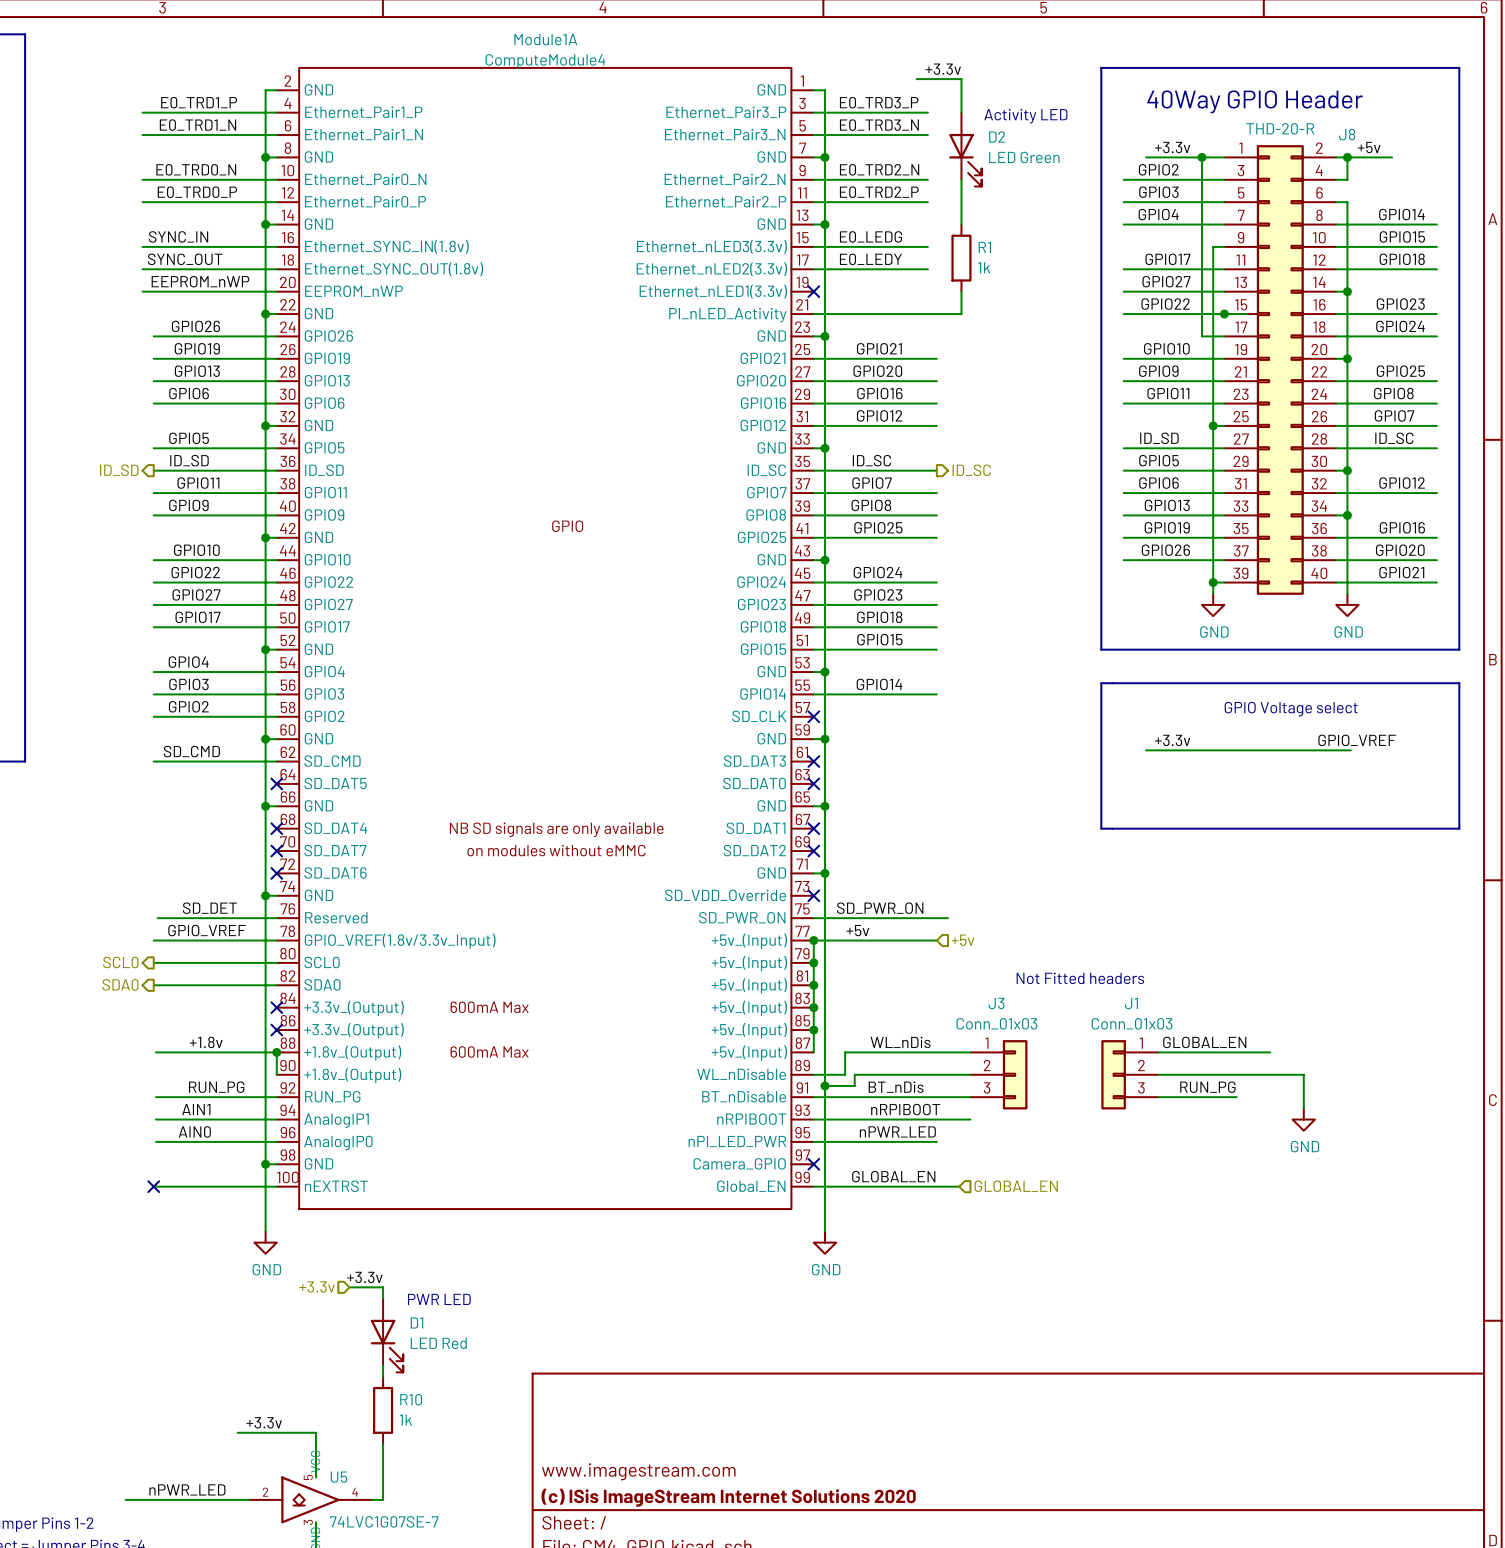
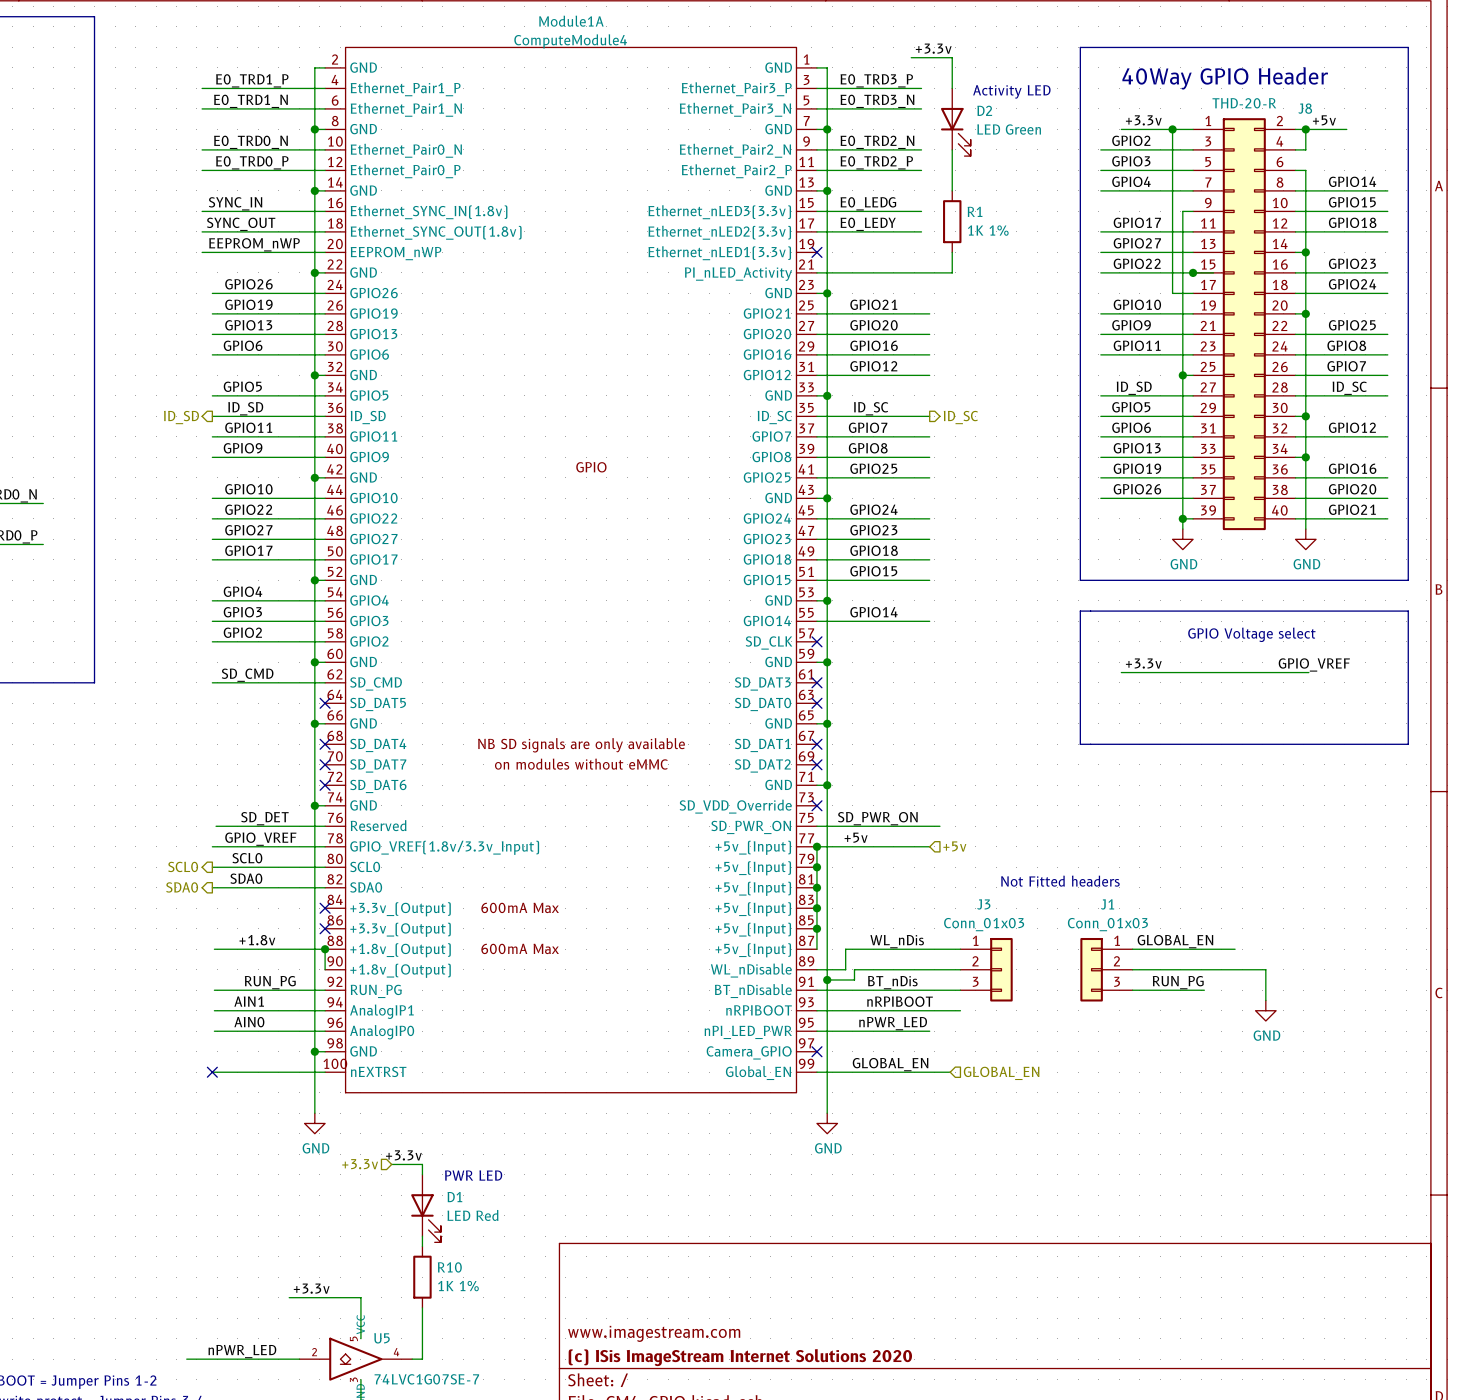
R1 value: 1k (984, 267) -> 1K 1% (988, 230)
label: none -> SCL0 (247, 858)
label: none -> SDA0 (246, 878)
R10 value: 1k (405, 1420) -> 1K 1% (458, 1286)

